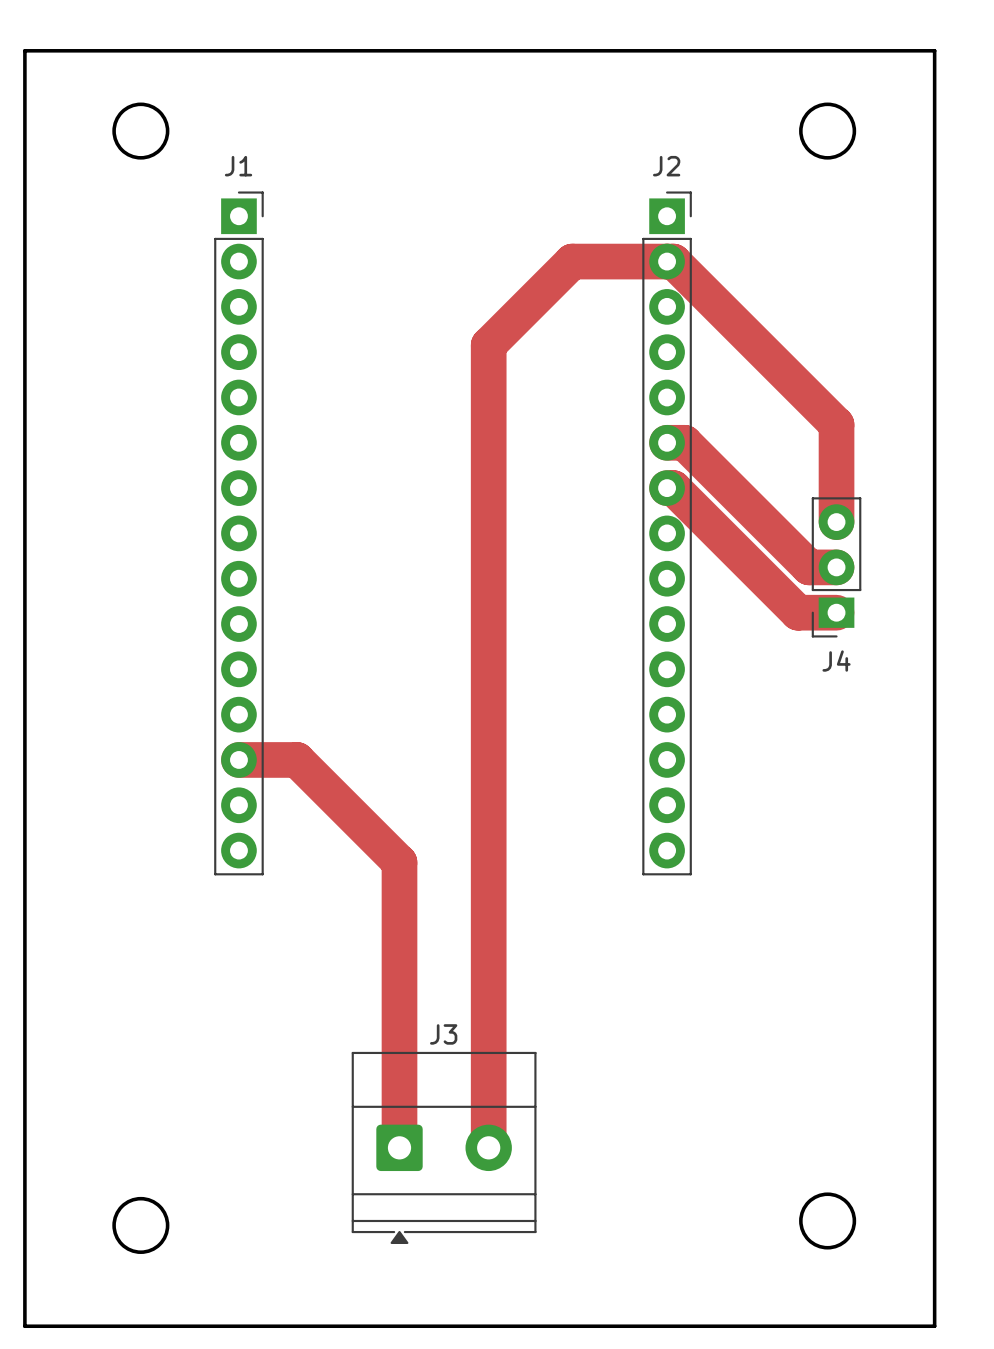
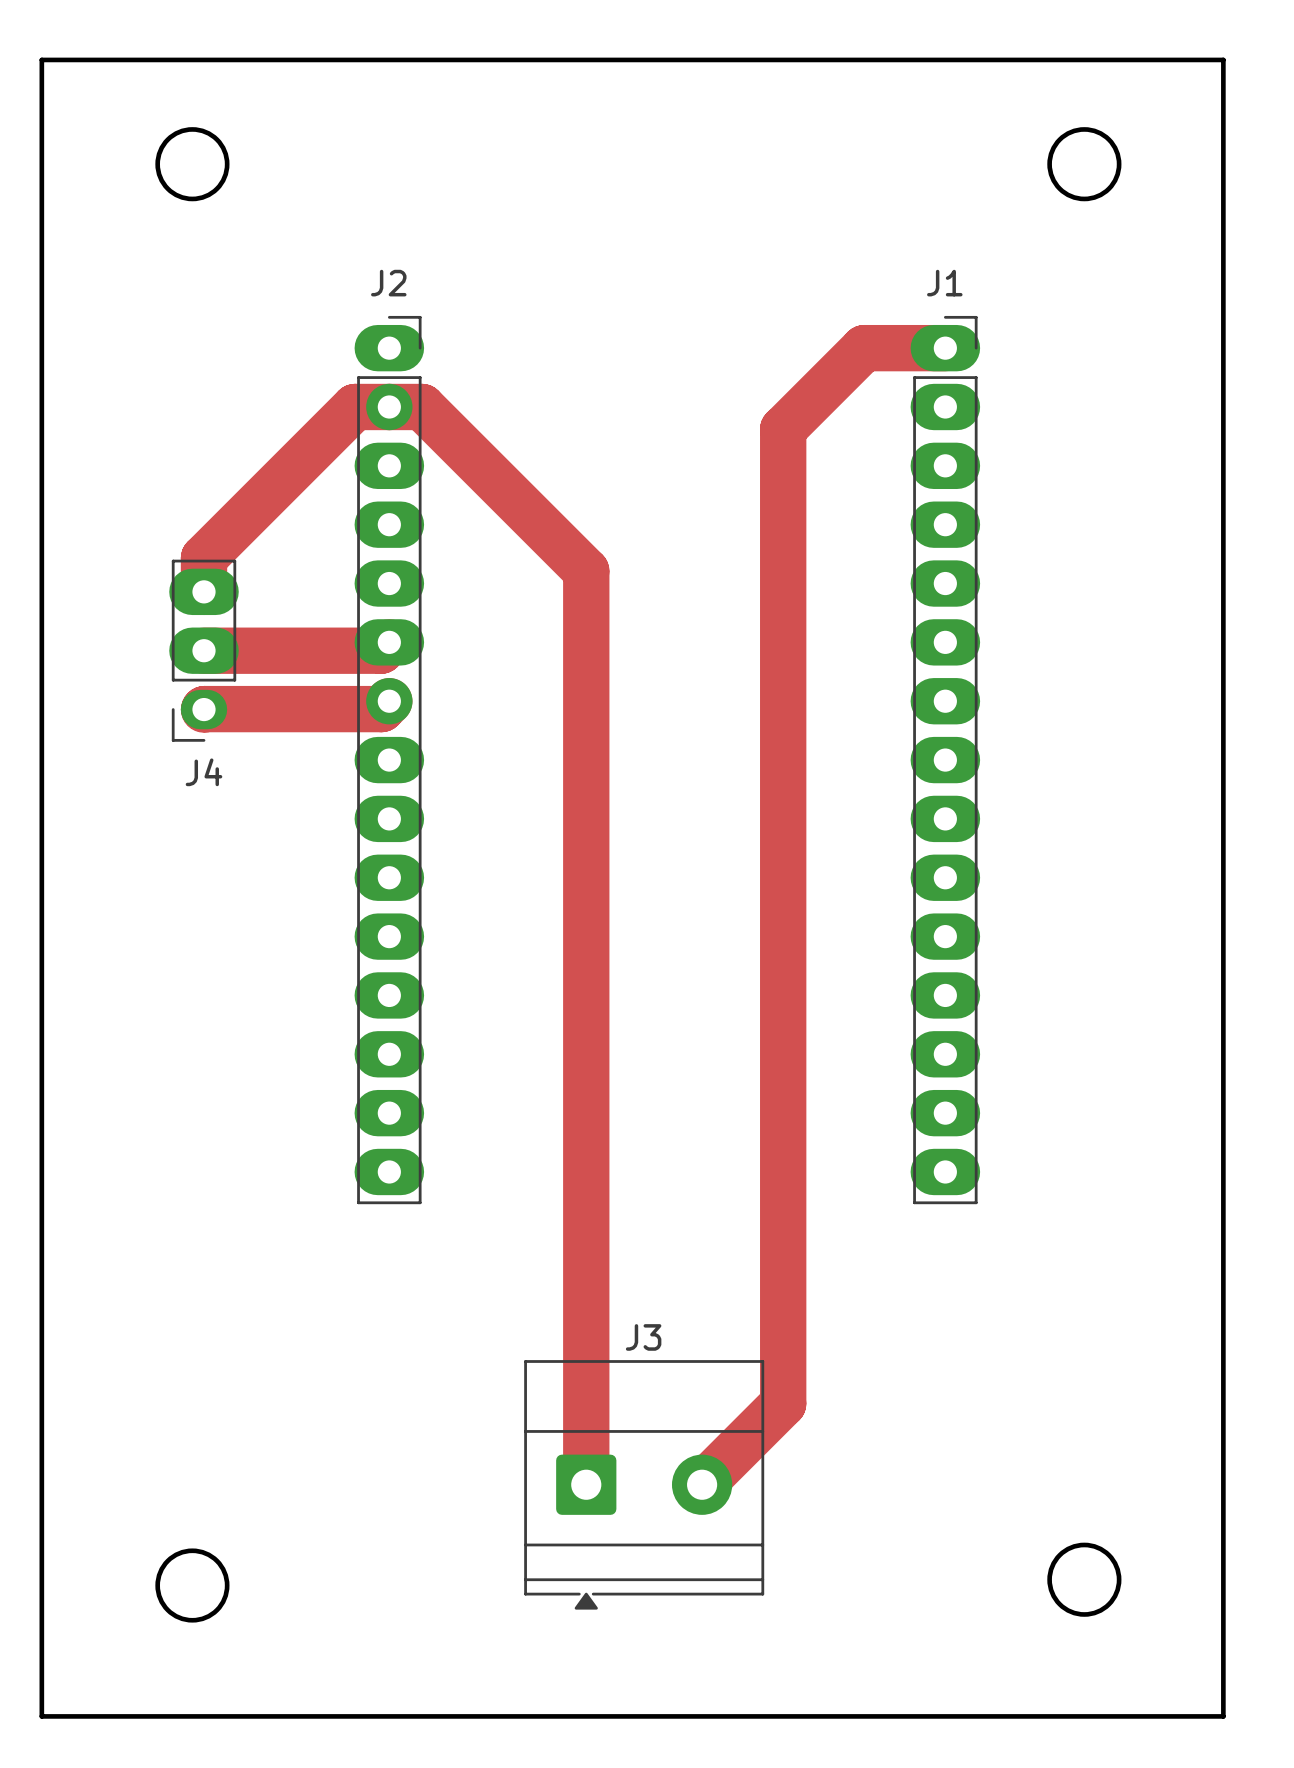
J1 footprint: [214, 191, 264, 876] -> [910, 315, 981, 1205]
J2 footprint: [642, 191, 692, 876] -> [354, 315, 425, 1205]
track: none -> (945, 348) (864, 348) (783, 429) (783, 1403) (702, 1484)
track: (667, 442) (684, 442) (809, 567) (836, 567) -> none
track: none -> (204, 591) (204, 558) (355, 406) (422, 406) (586, 571) (586, 1484)
track: (667, 488) (673, 488) (798, 612) (836, 612) -> none
J4 footprint: [811, 497, 862, 638] -> [169, 559, 239, 742]
track: none -> (389, 642) (381, 650) (204, 650)
track: (836, 522) (836, 424) (673, 261) (572, 261) (488, 345) (488, 1147) -> none
track: none -> (389, 701) (381, 709) (204, 709)
track: (238, 759) (297, 759) (399, 862) (399, 1147) -> none
J3 position: (444, 1147) -> (644, 1484)

